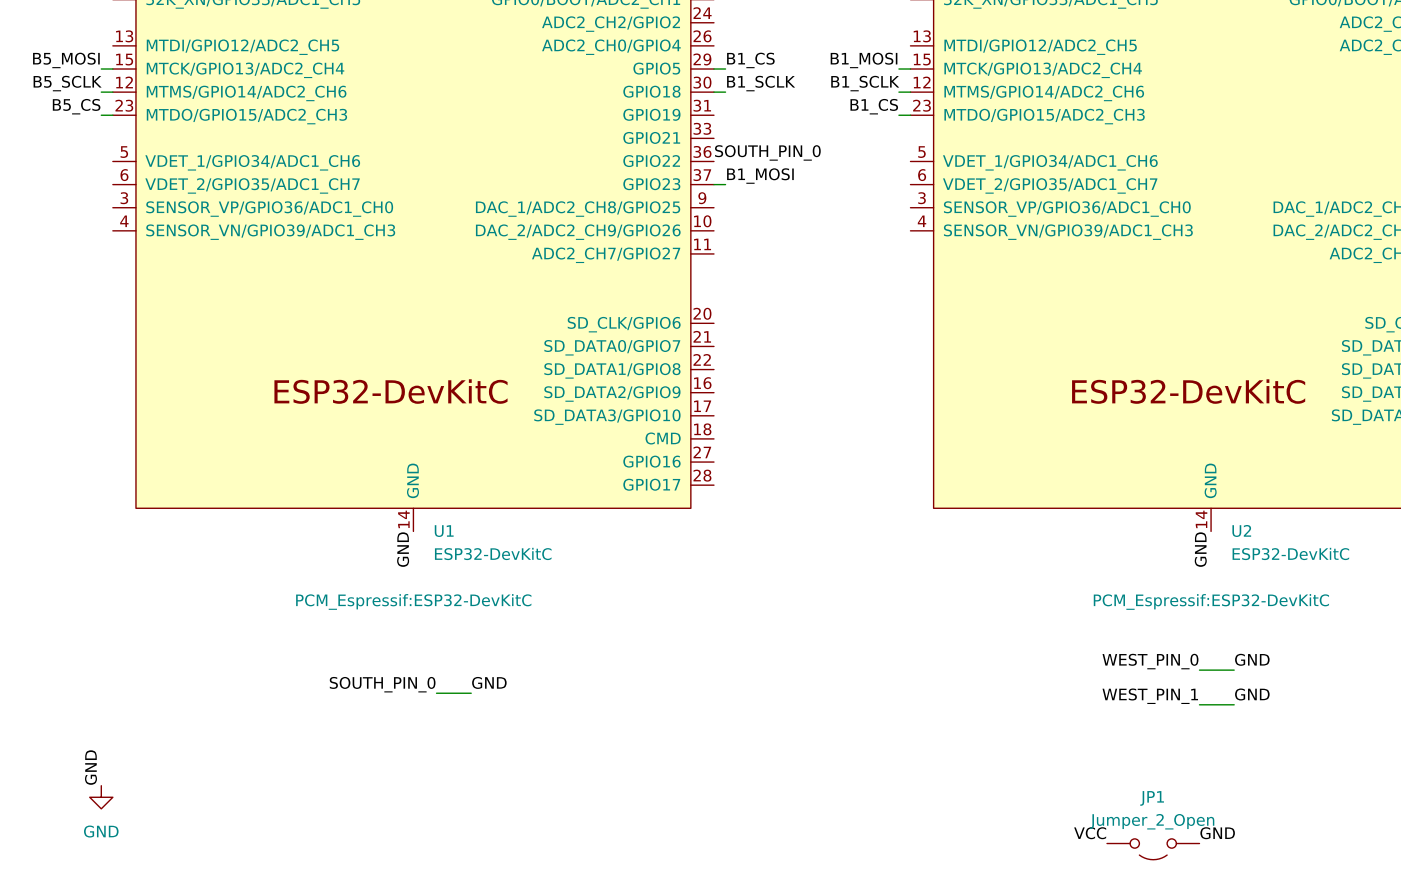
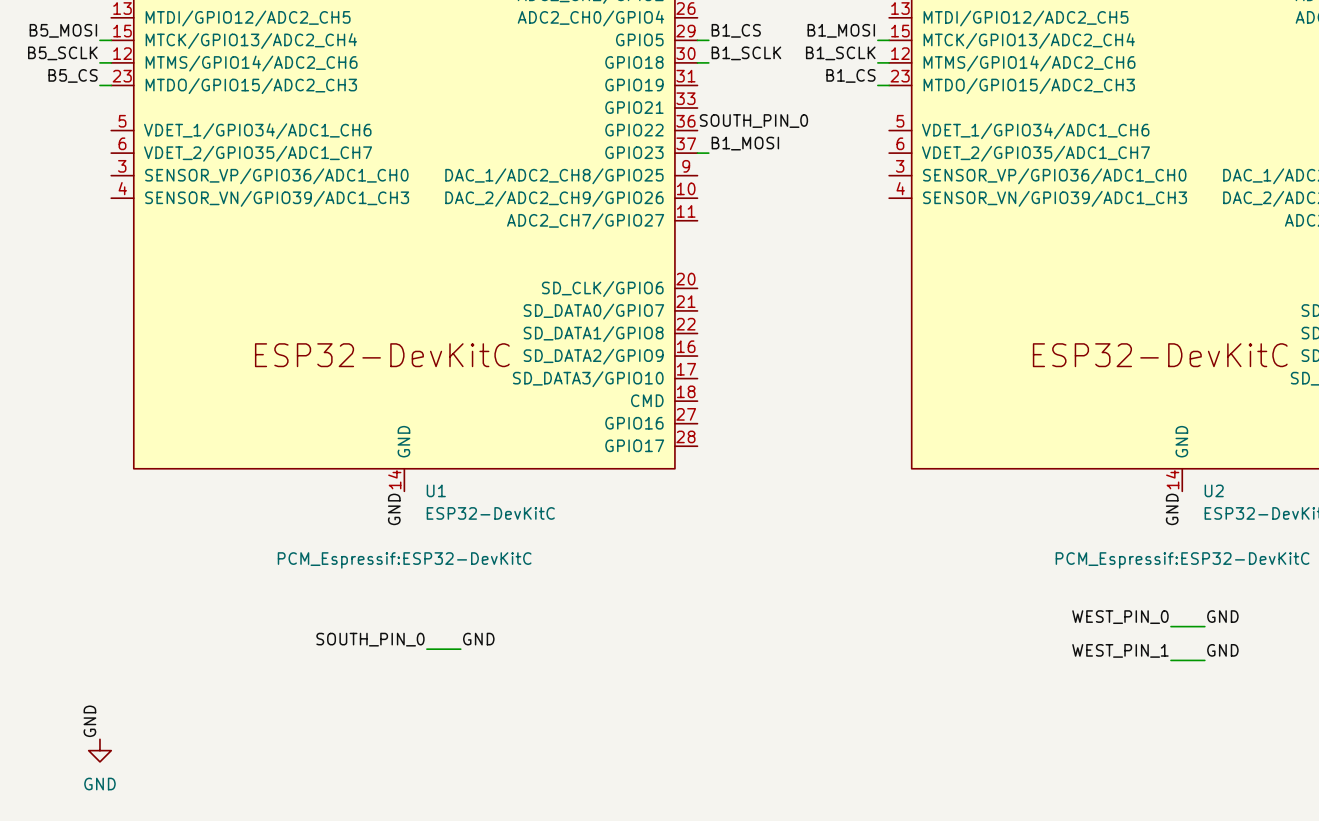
label: VCC (1090, 833) -> none
label: GND (1217, 833) -> none
JP1: Jumper_2_Open (1153, 849) -> none

